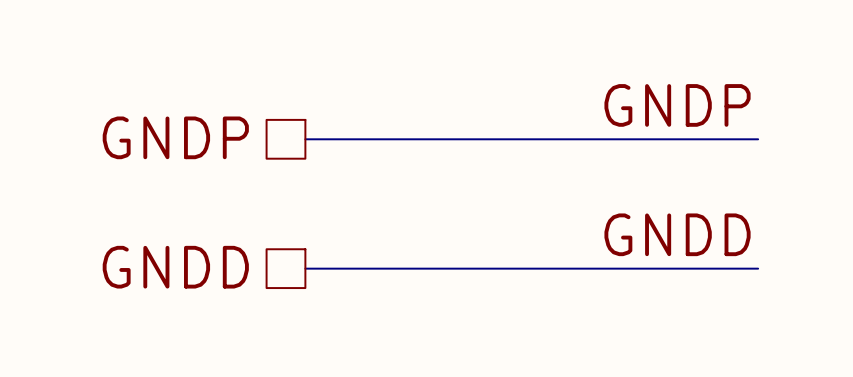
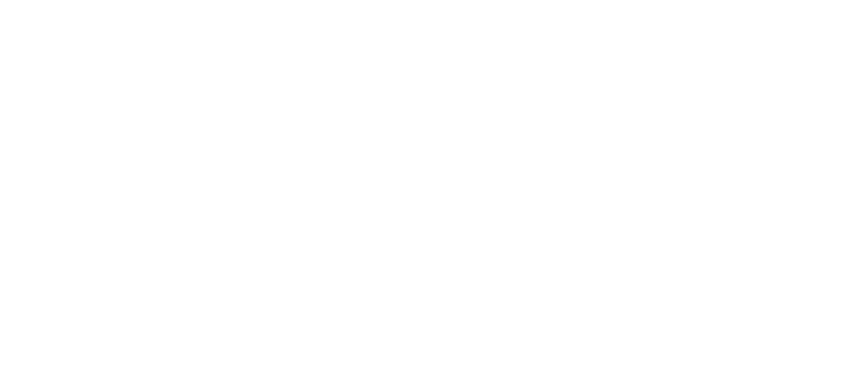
label: GNDP (677, 105) -> none
hierarchical label: GNDP (175, 137) -> none
wire: (305, 139) (758, 139) -> none
label: GNDD (677, 234) -> none
hierarchical label: GNDD (175, 267) -> none
wire: (305, 268) (758, 268) -> none

